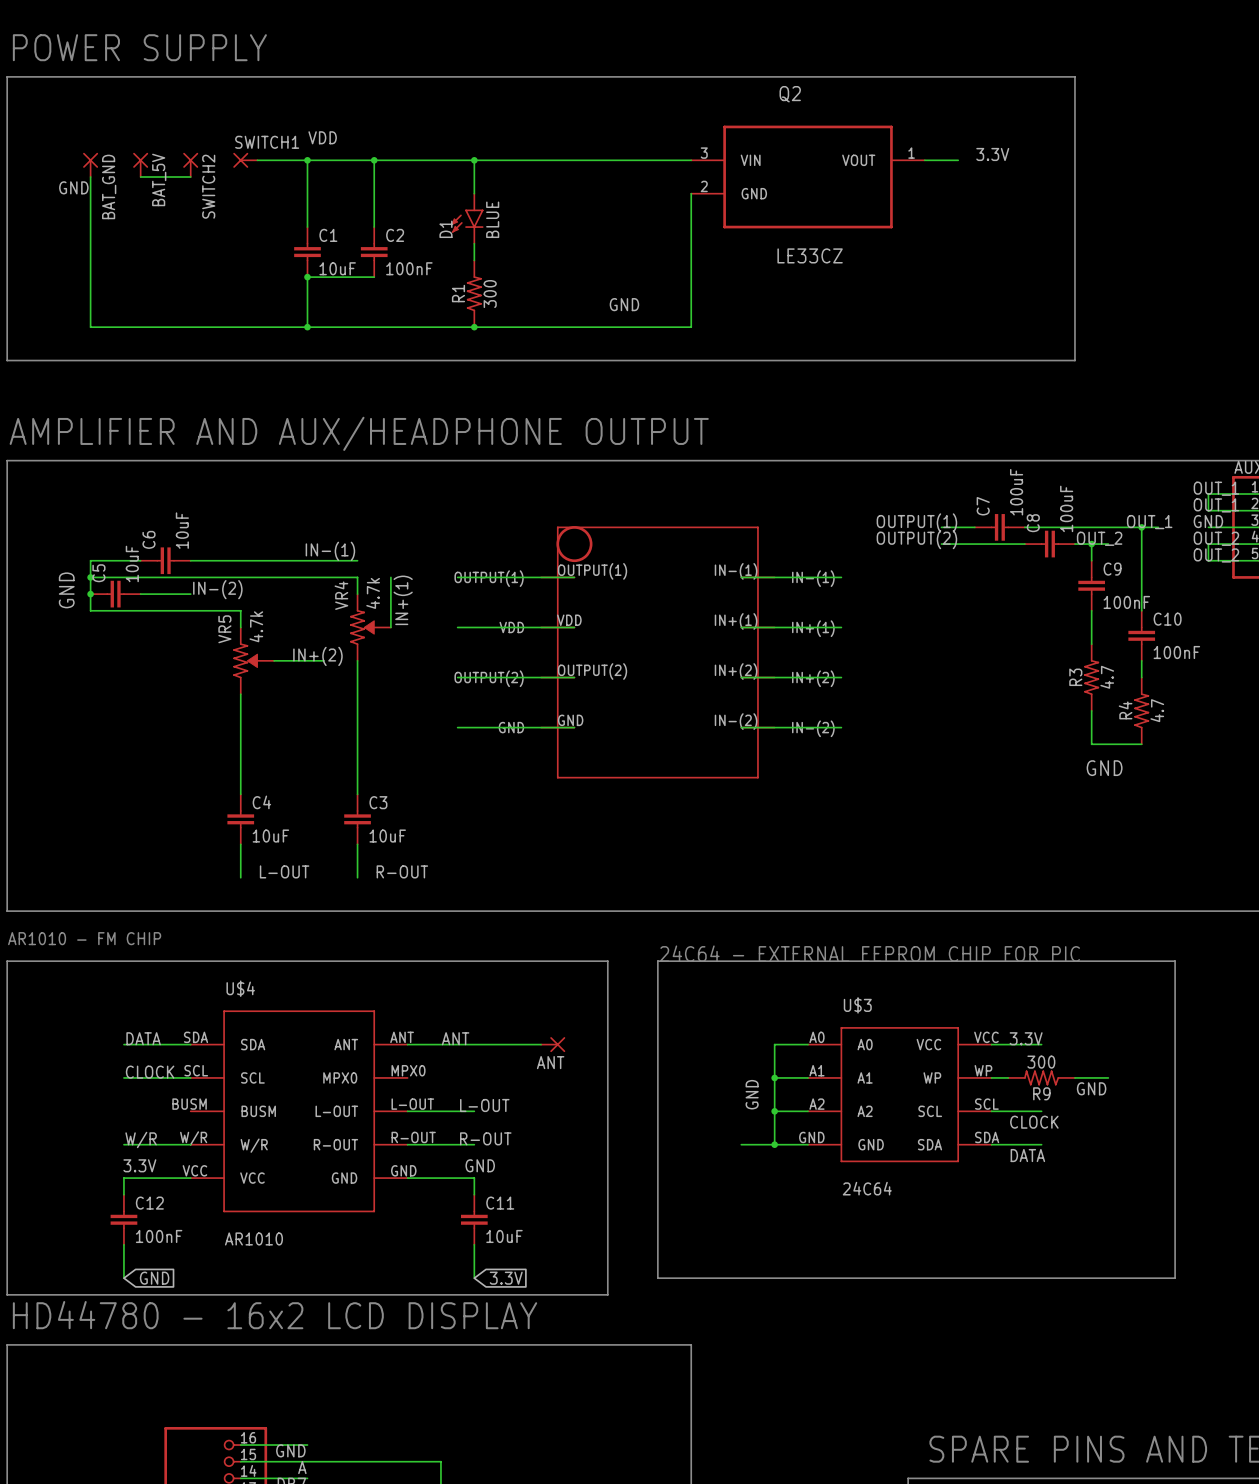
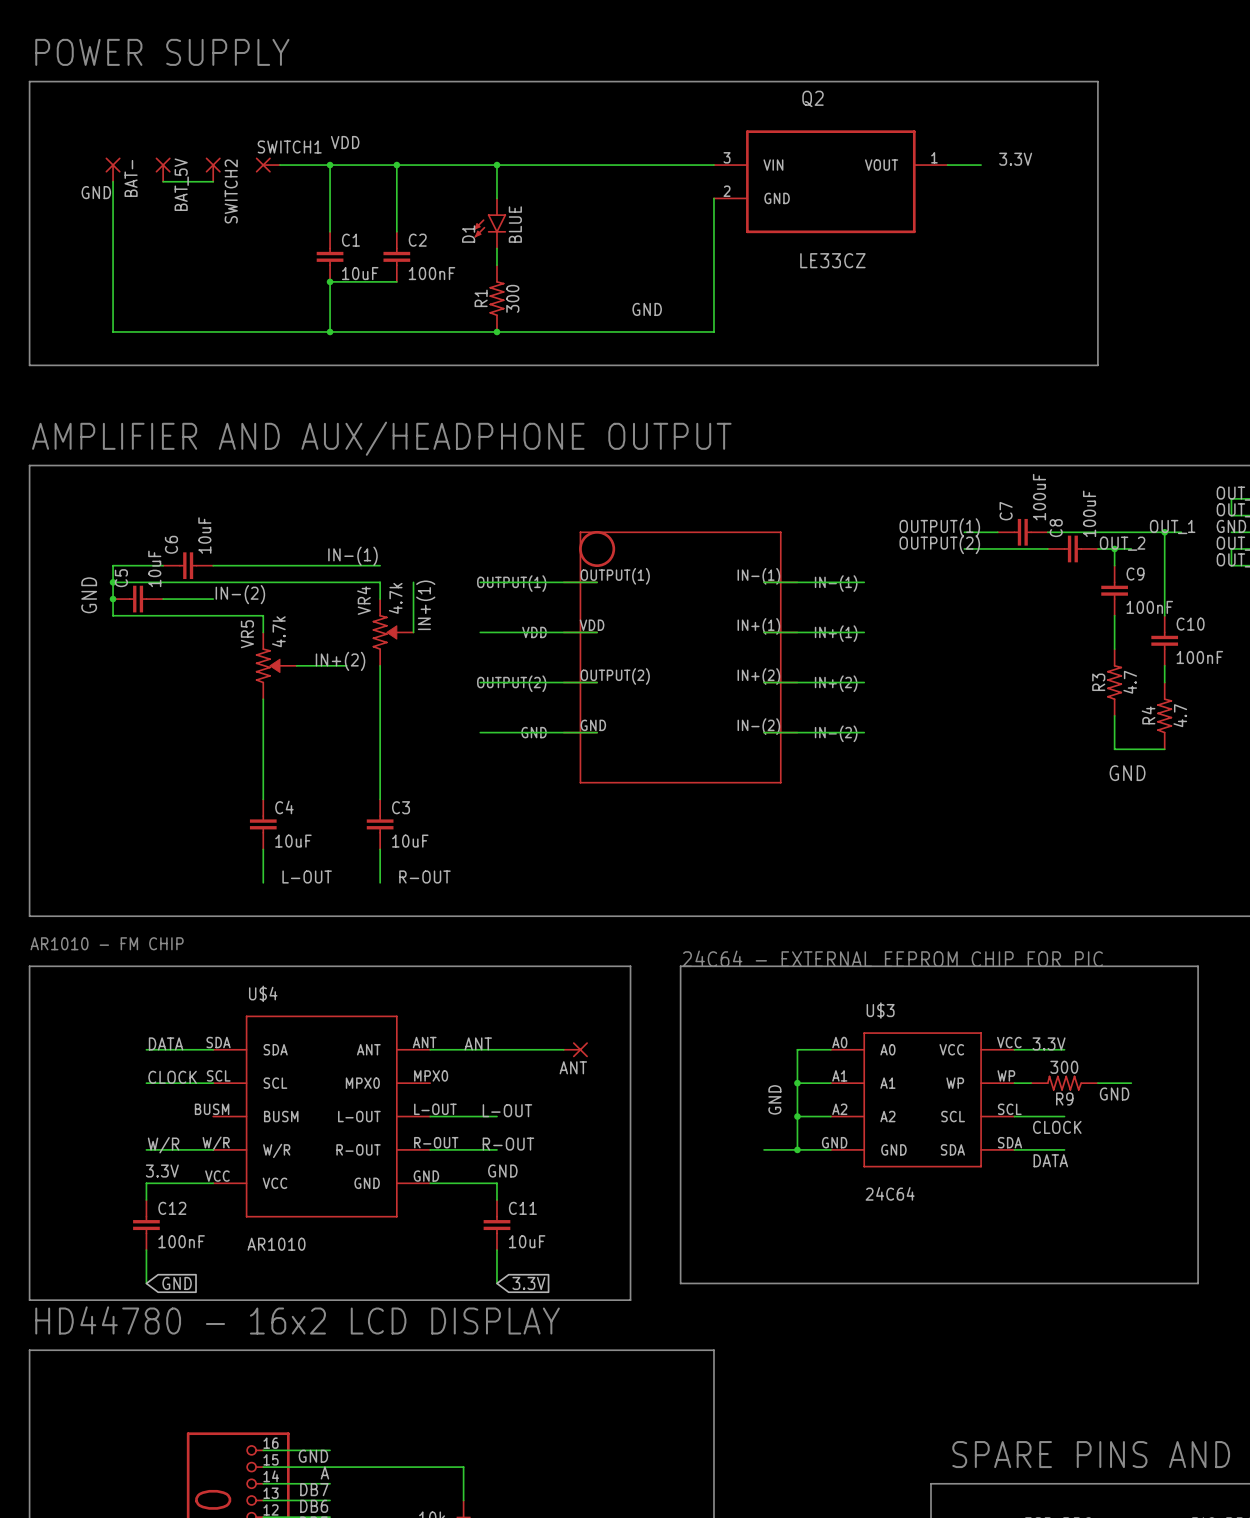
BAT_GND name: BAT_GND (109, 186) -> BAT- (131, 178)

